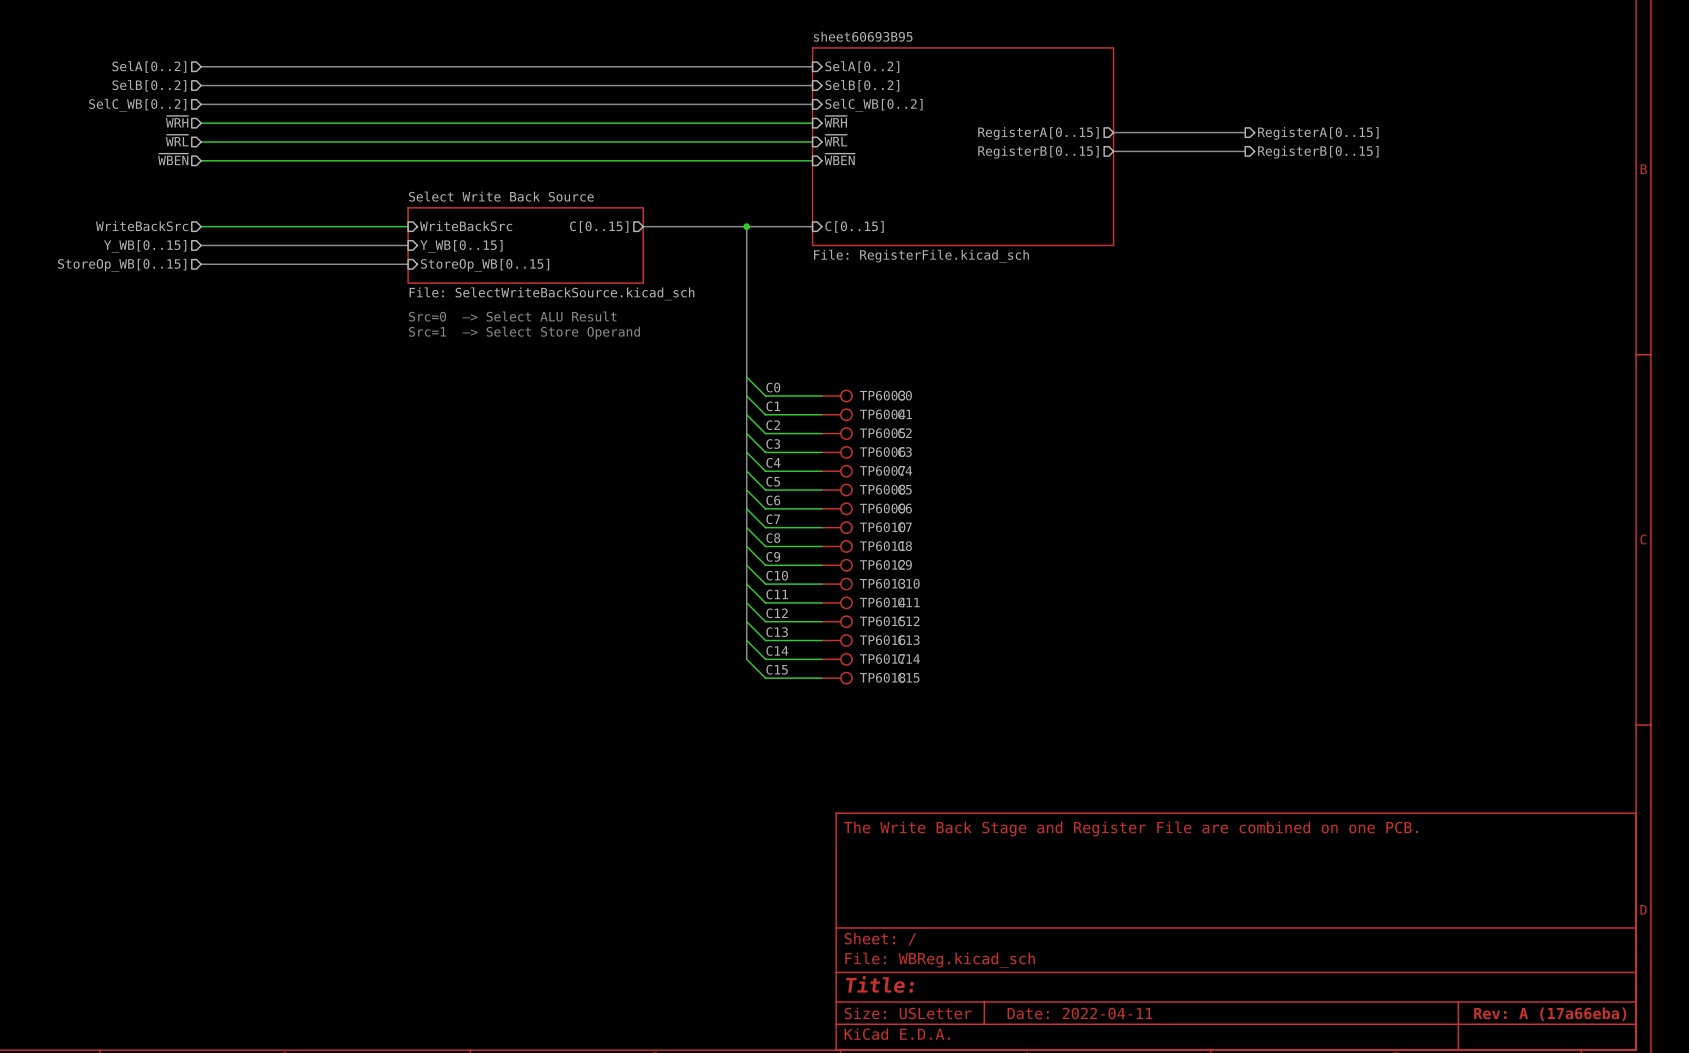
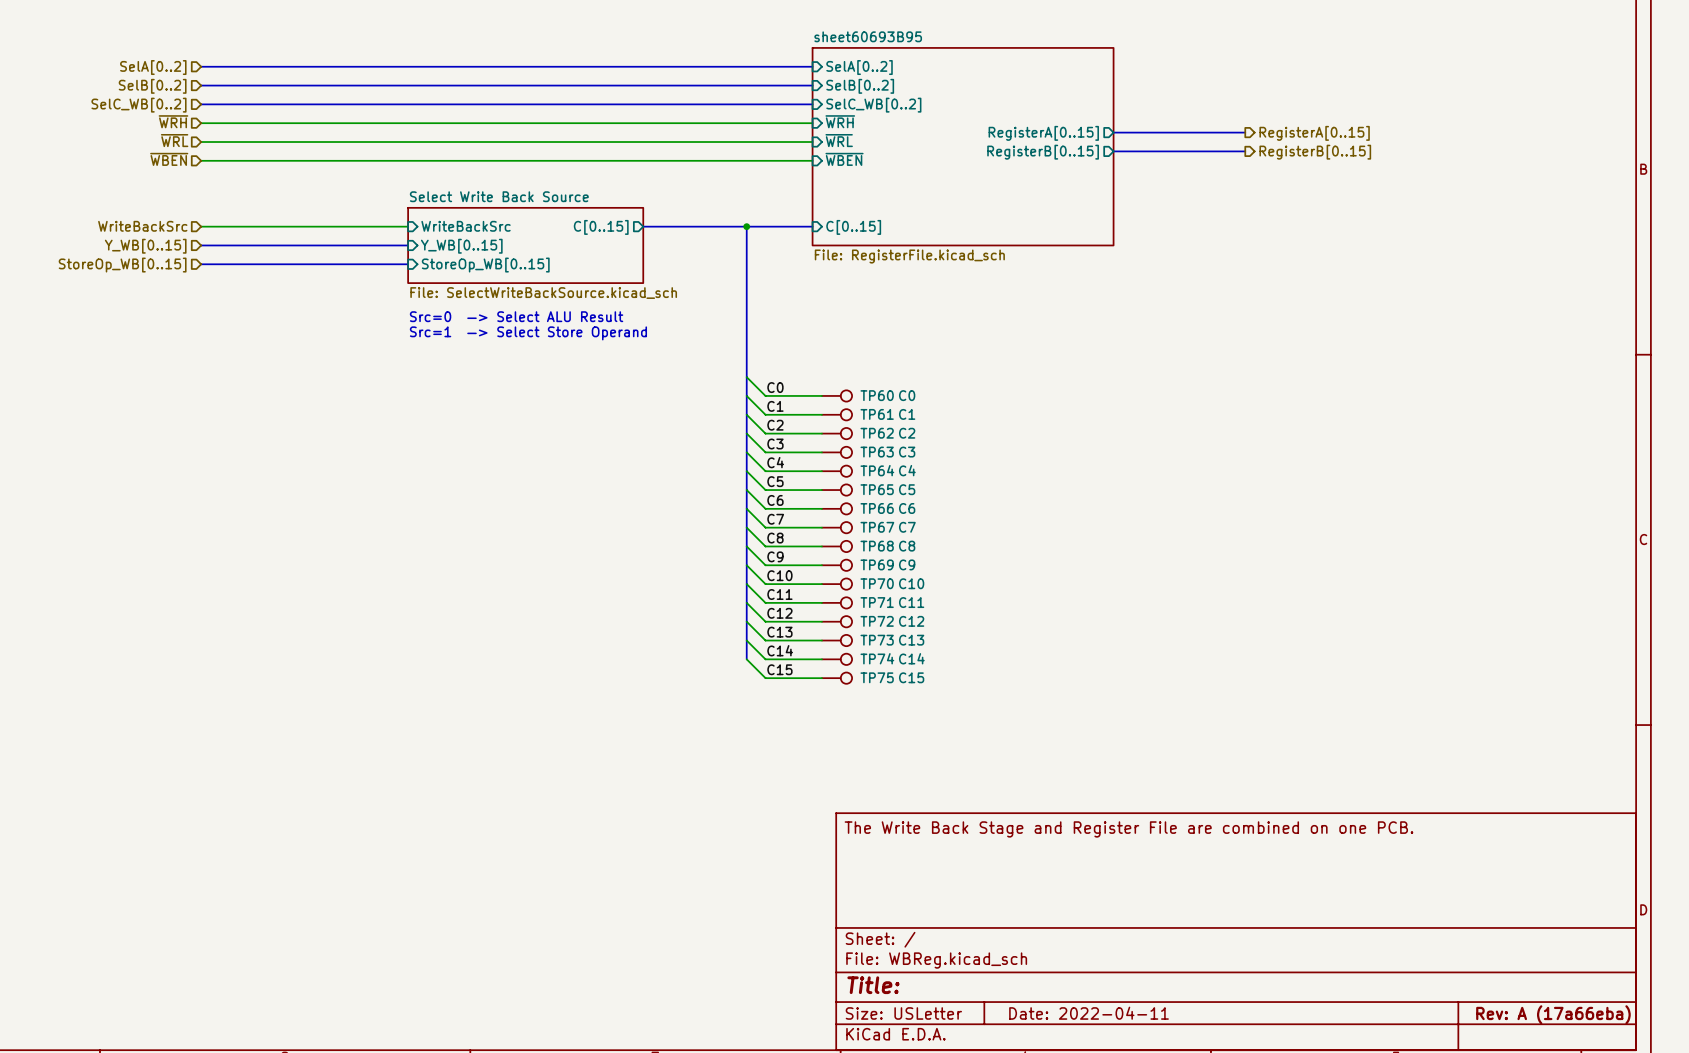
TP6003 name: TP6003 (882, 395) -> TP60 (877, 395)
TP6004 name: TP6004 (882, 414) -> TP61 (877, 414)
TP6005 name: TP6005 (882, 433) -> TP62 (877, 433)
TP6006 name: TP6006 (882, 452) -> TP63 (877, 452)
TP6007 name: TP6007 (882, 470) -> TP64 (877, 470)
TP6008 name: TP6008 (882, 489) -> TP65 (877, 489)
TP6009 name: TP6009 (882, 508) -> TP66 (877, 508)
TP6010 name: TP6010 (882, 527) -> TP67 (877, 527)
TP6011 name: TP6011 (882, 546) -> TP68 (877, 546)
TP6012 name: TP6012 (882, 564) -> TP69 (877, 564)
TP6013 name: TP6013 (882, 583) -> TP70 (877, 583)
TP6014 name: TP6014 (882, 602) -> TP71 (877, 602)
TP6015 name: TP6015 (882, 621) -> TP72 (877, 621)
TP6016 name: TP6016 (882, 640) -> TP73 (877, 640)
TP6017 name: TP6017 (882, 659) -> TP74 (877, 658)
TP6018 name: TP6018 (882, 677) -> TP75 (877, 677)

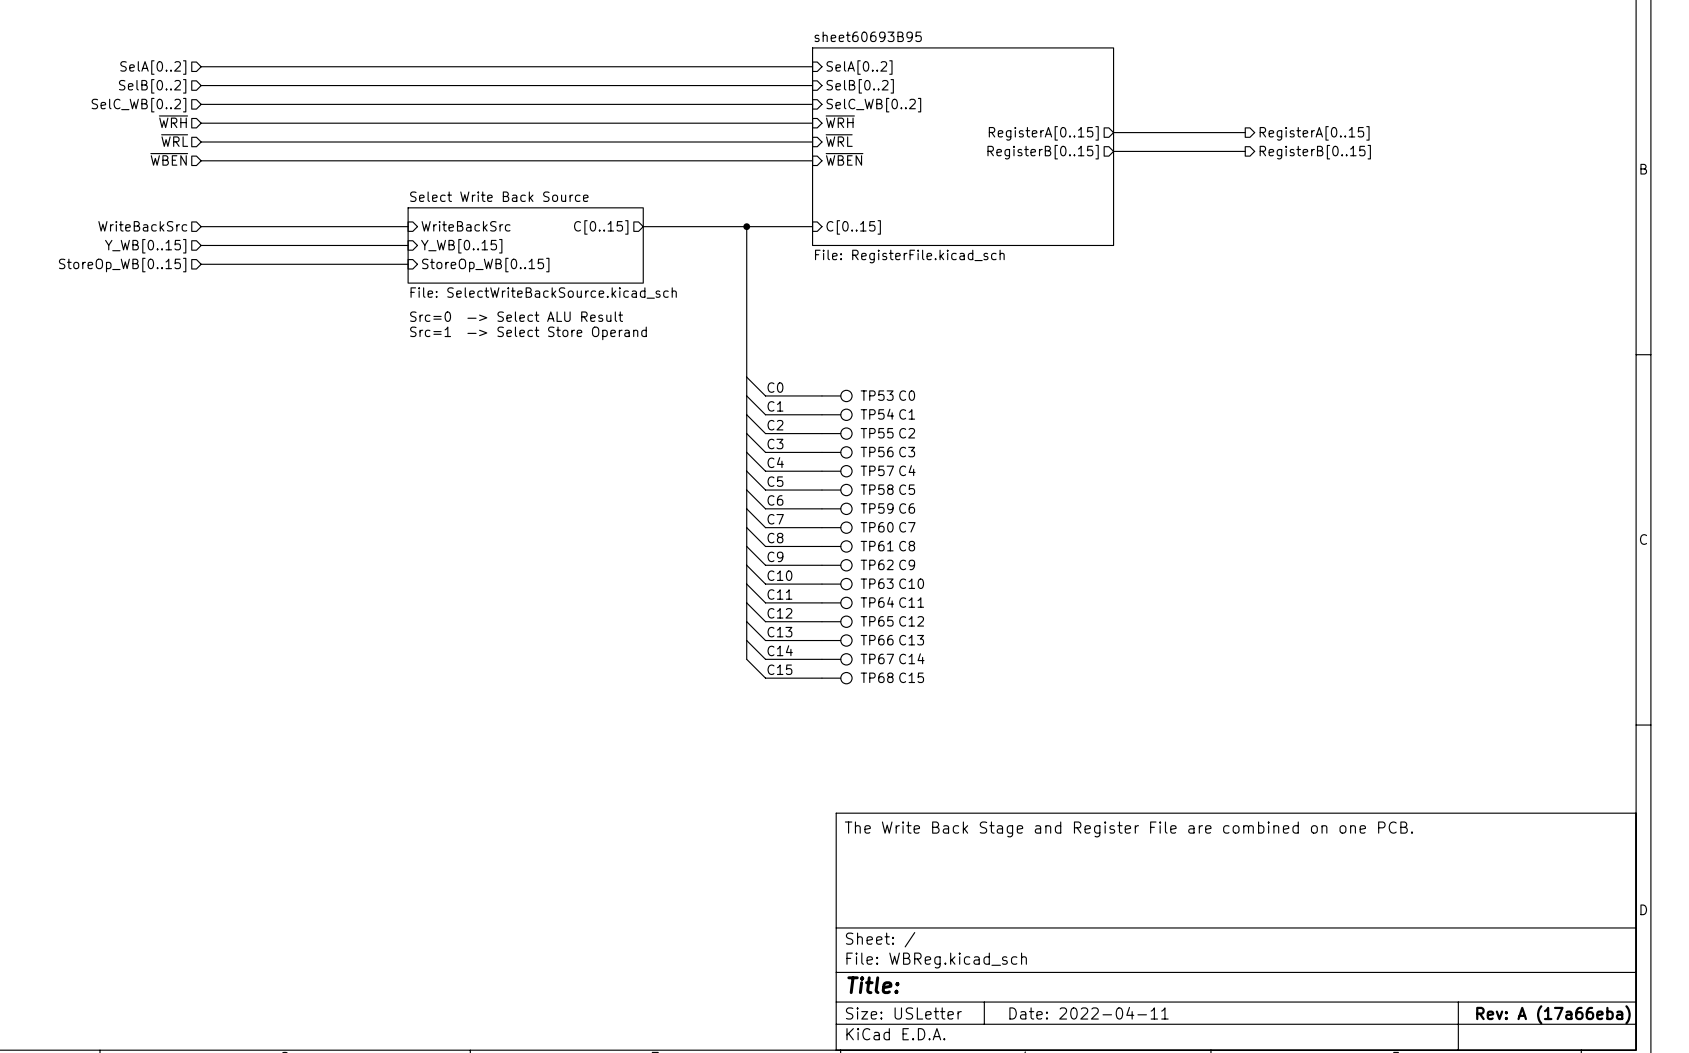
TP60 name: TP60 (877, 395) -> TP53 (877, 395)
TP61 name: TP61 (877, 414) -> TP54 (877, 414)
TP62 name: TP62 (877, 433) -> TP55 (877, 433)
TP63 name: TP63 (877, 452) -> TP56 (877, 452)
TP64 name: TP64 (877, 470) -> TP57 (877, 470)
TP65 name: TP65 (877, 489) -> TP58 (877, 489)
TP66 name: TP66 (877, 508) -> TP59 (877, 508)
TP67 name: TP67 (877, 527) -> TP60 (877, 527)
TP68 name: TP68 (877, 546) -> TP61 (877, 546)
TP69 name: TP69 (877, 564) -> TP62 (877, 564)
TP70 name: TP70 (877, 583) -> TP63 (877, 583)
TP71 name: TP71 (877, 602) -> TP64 (877, 602)
TP72 name: TP72 (877, 621) -> TP65 (877, 621)
TP73 name: TP73 (877, 640) -> TP66 (877, 640)
TP74 name: TP74 (877, 658) -> TP67 (877, 658)
TP75 name: TP75 (877, 677) -> TP68 (877, 677)

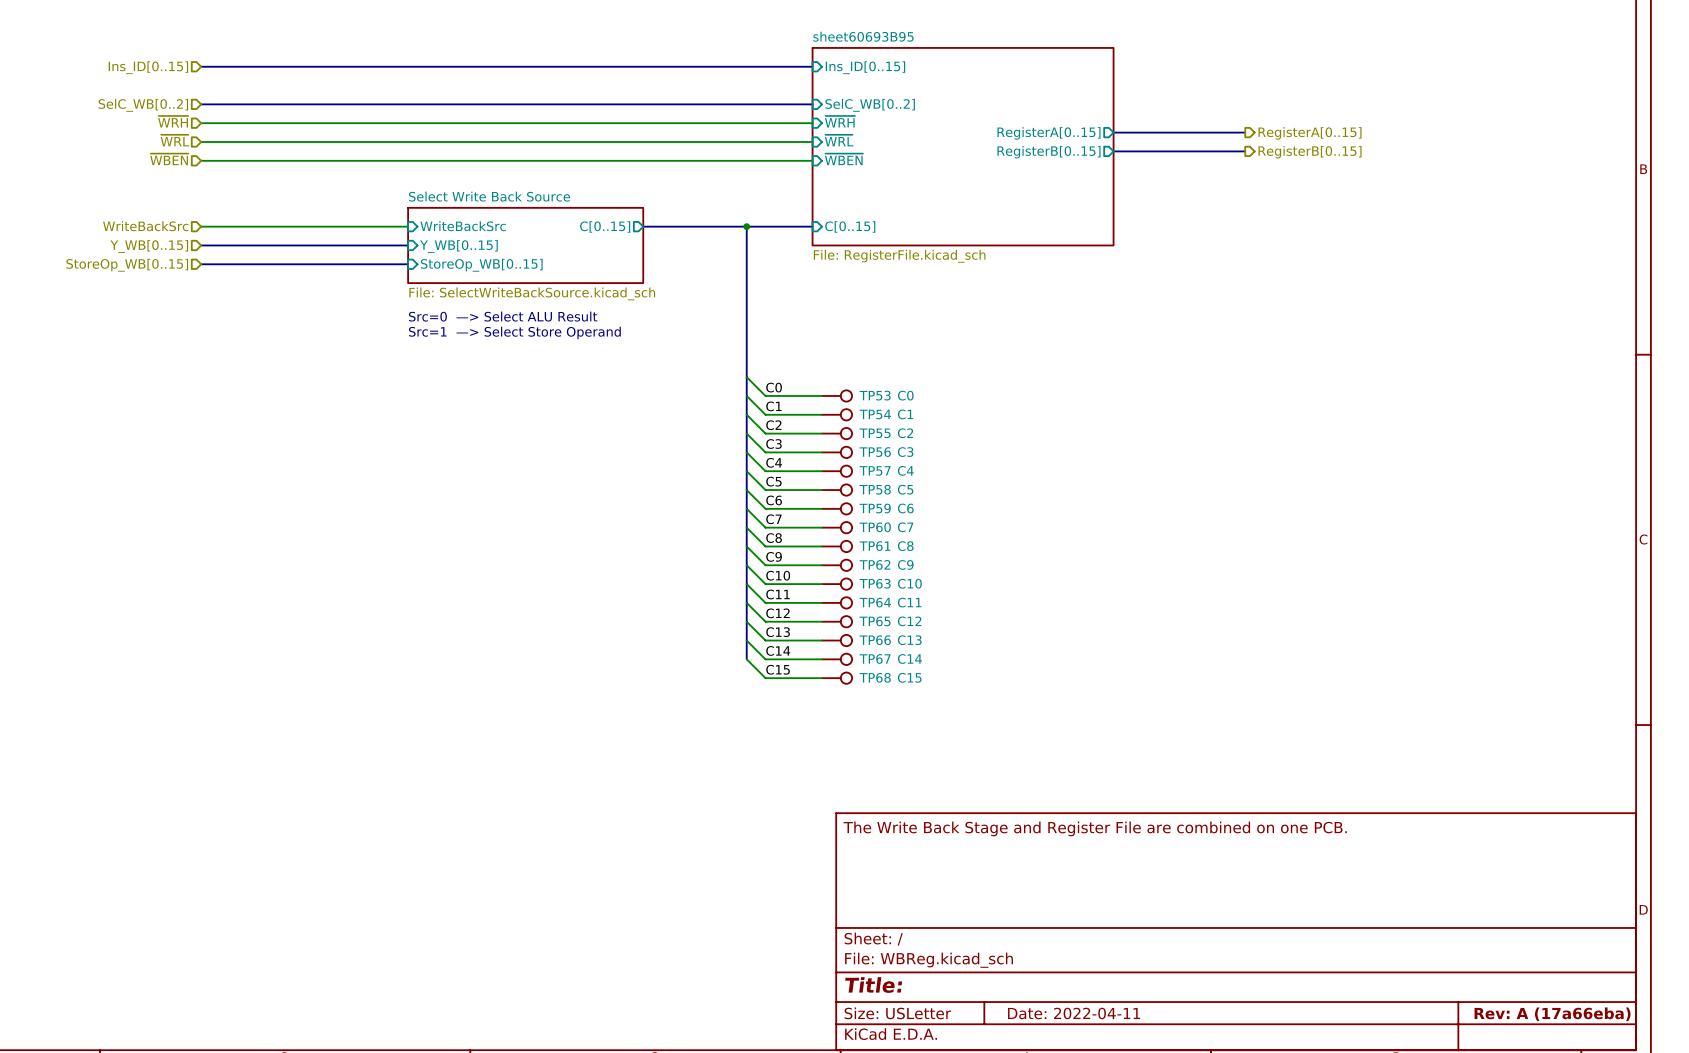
hierarchical label: SelA[0..2] (153, 67) -> Ins_ID[0..15] (148, 67)
sheet pin: SelA[0..2] (859, 67) -> Ins_ID[0..15] (865, 67)
bus: (201, 85) (812, 85) -> none
hierarchical label: SelB[0..2] (152, 86) -> none
sheet pin: SelB[0..2] (860, 86) -> none

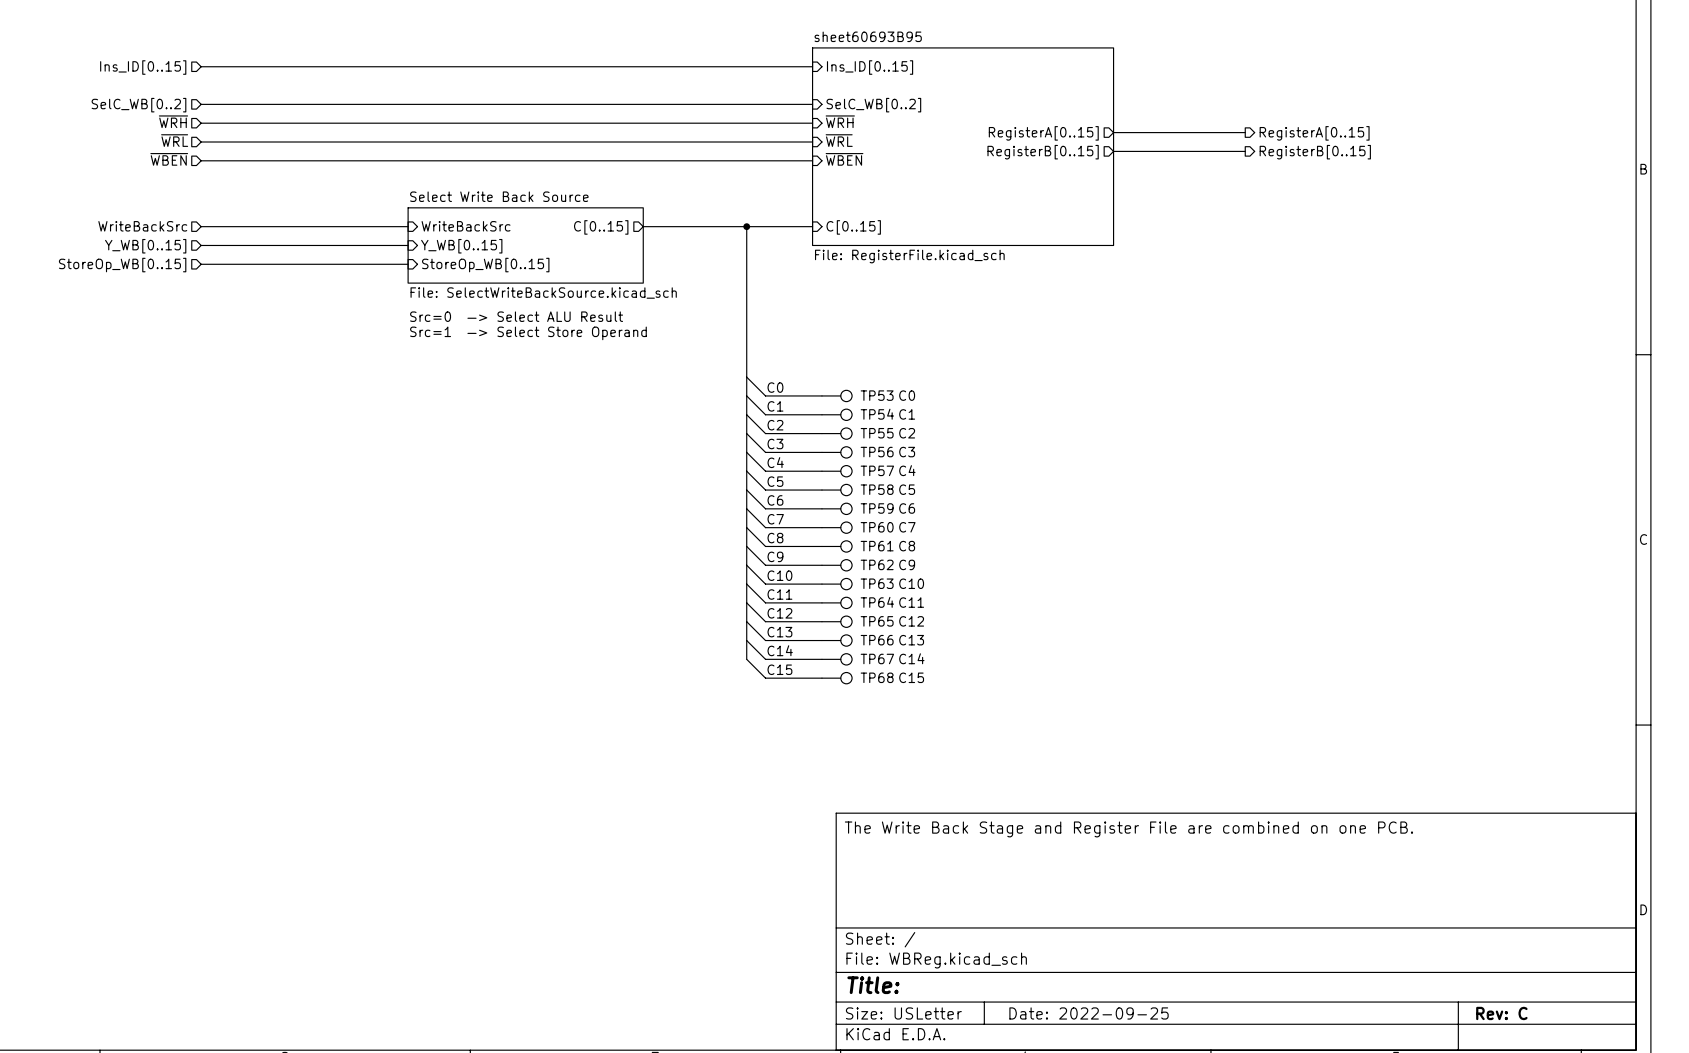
title block: Date: 2022-04-11 (1074, 1013) -> Date: 2022-09-25 (1089, 1013)
title block: Rev: A (17a66eba) (1552, 1014) -> Rev: C (1501, 1013)

